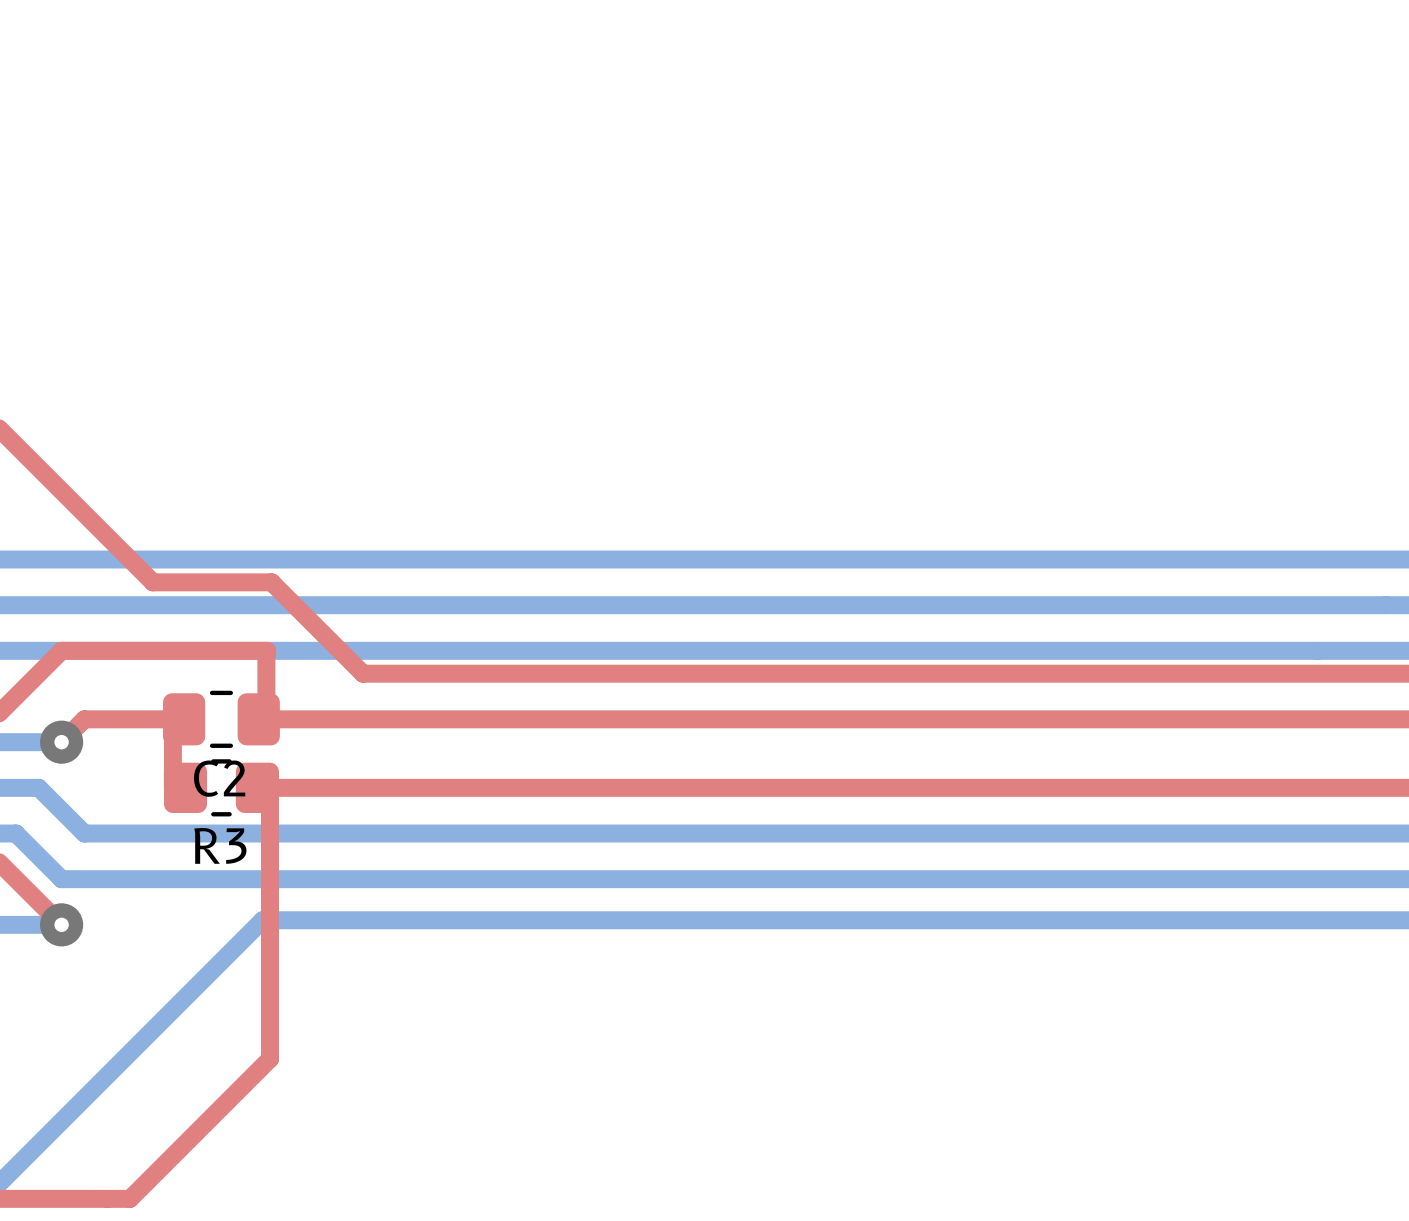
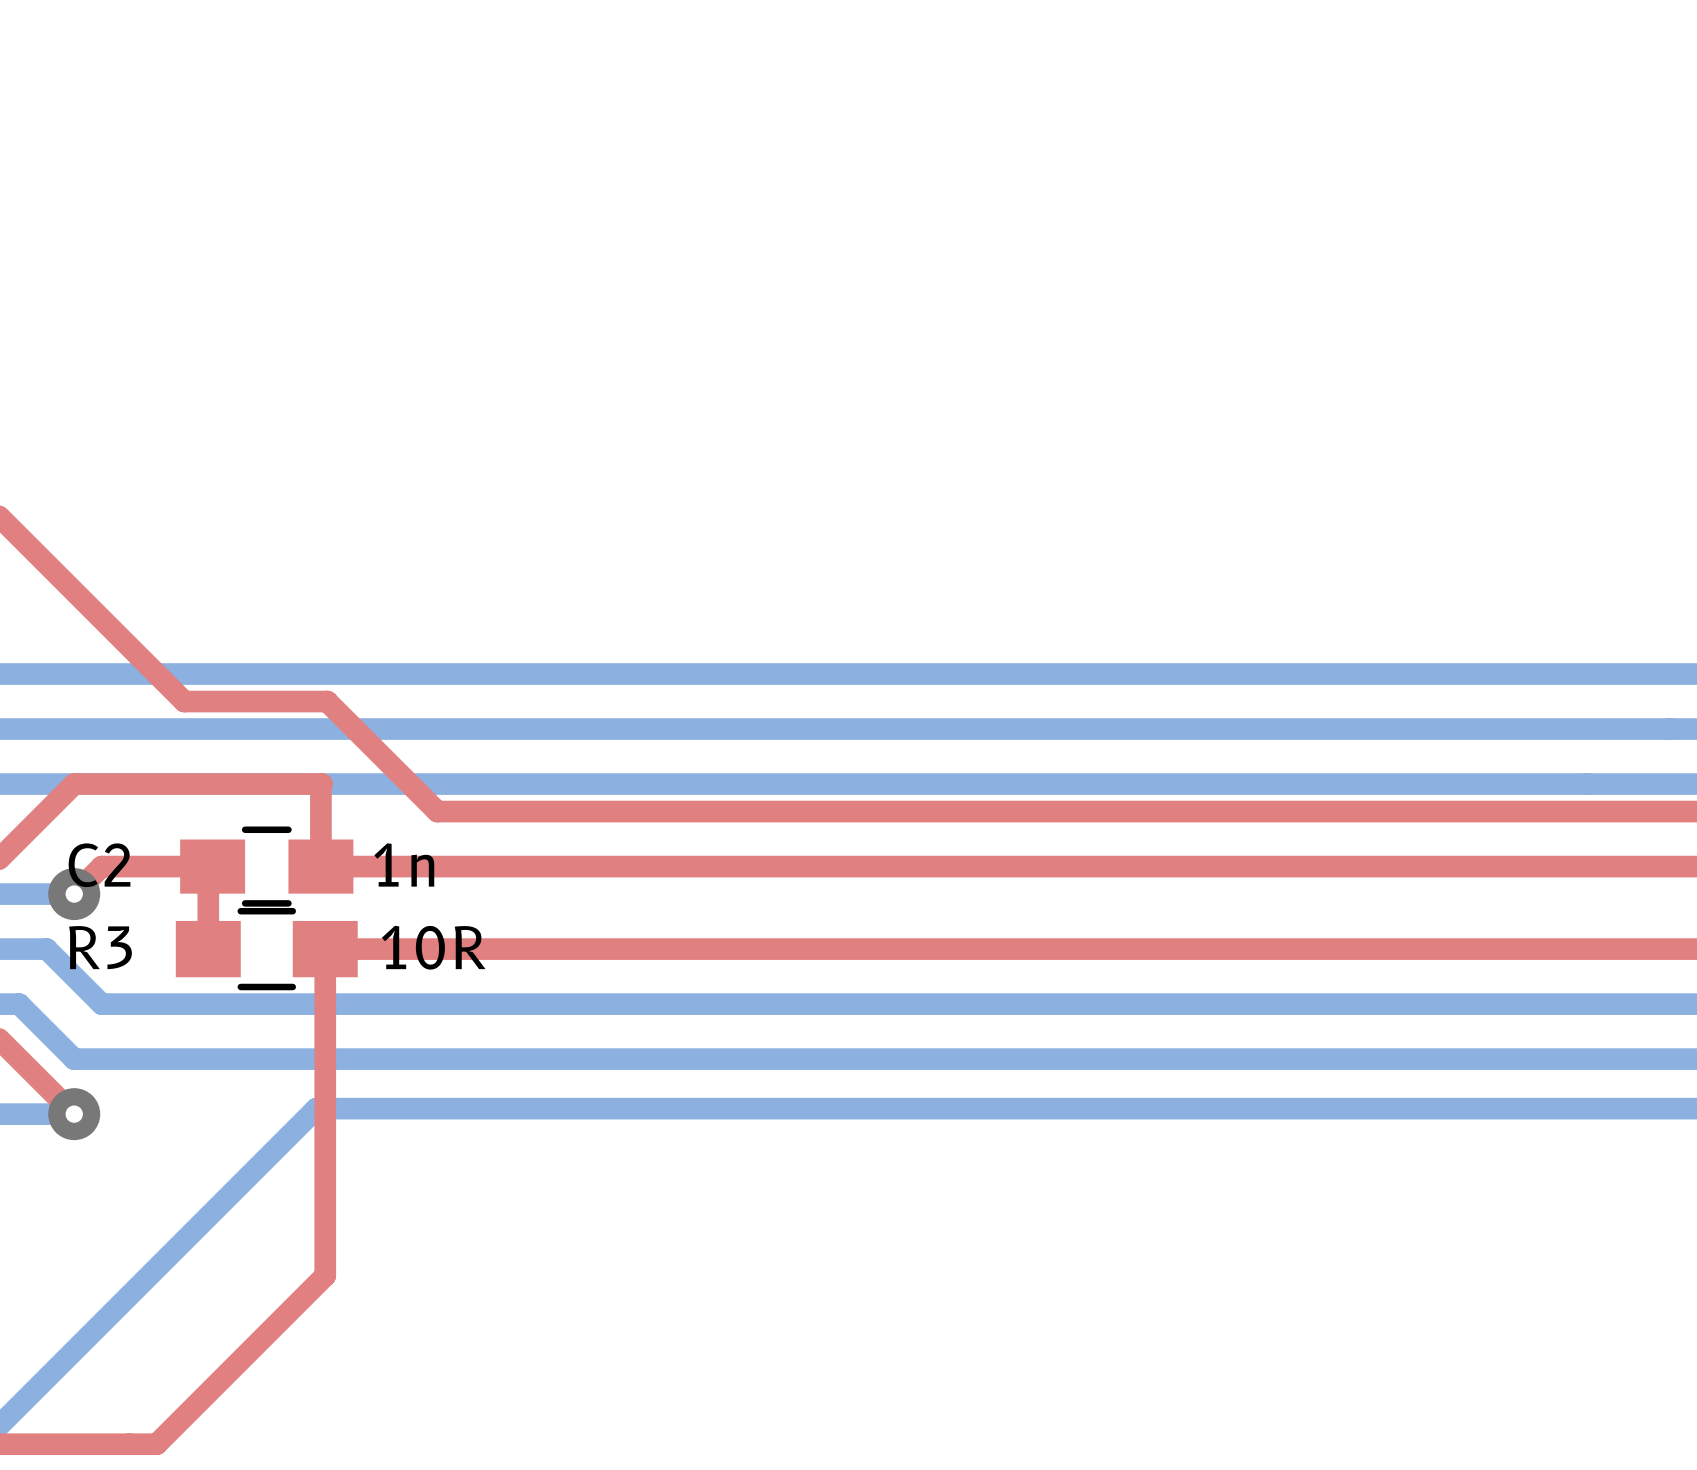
C2 footprint: [163, 690, 280, 748] -> [180, 826, 354, 907]
C2 value: none -> 1n (404, 864)
R3 footprint: [163, 759, 279, 817] -> [175, 907, 358, 991]
C2 name position: C2 (219, 778) -> C2 (99, 865)
R3 value: none -> 10R (433, 947)
R3 name position: R3 (220, 845) -> R3 (100, 947)

